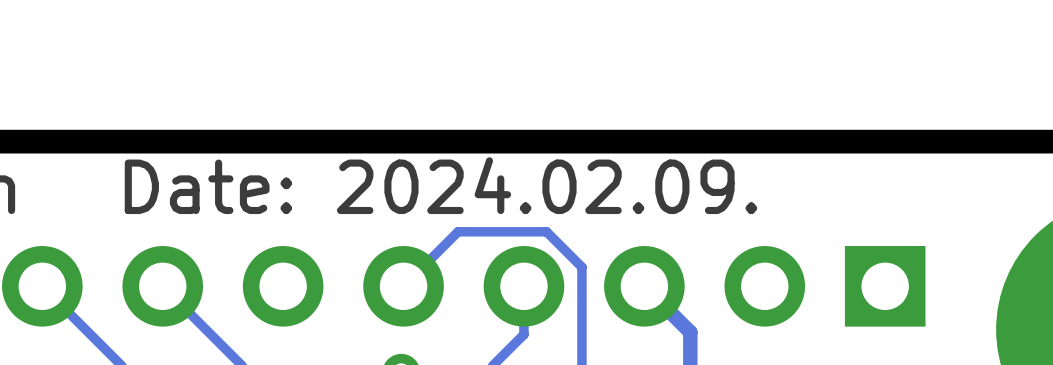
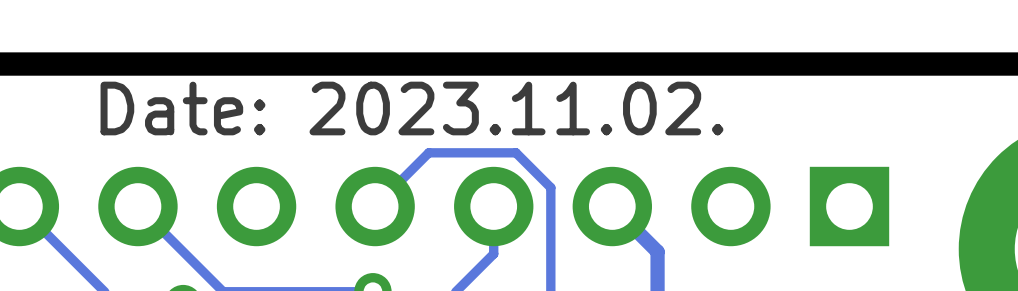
text: Date: 2024.02.09. (440, 185) -> Date: 2023.11.02. (411, 108)

